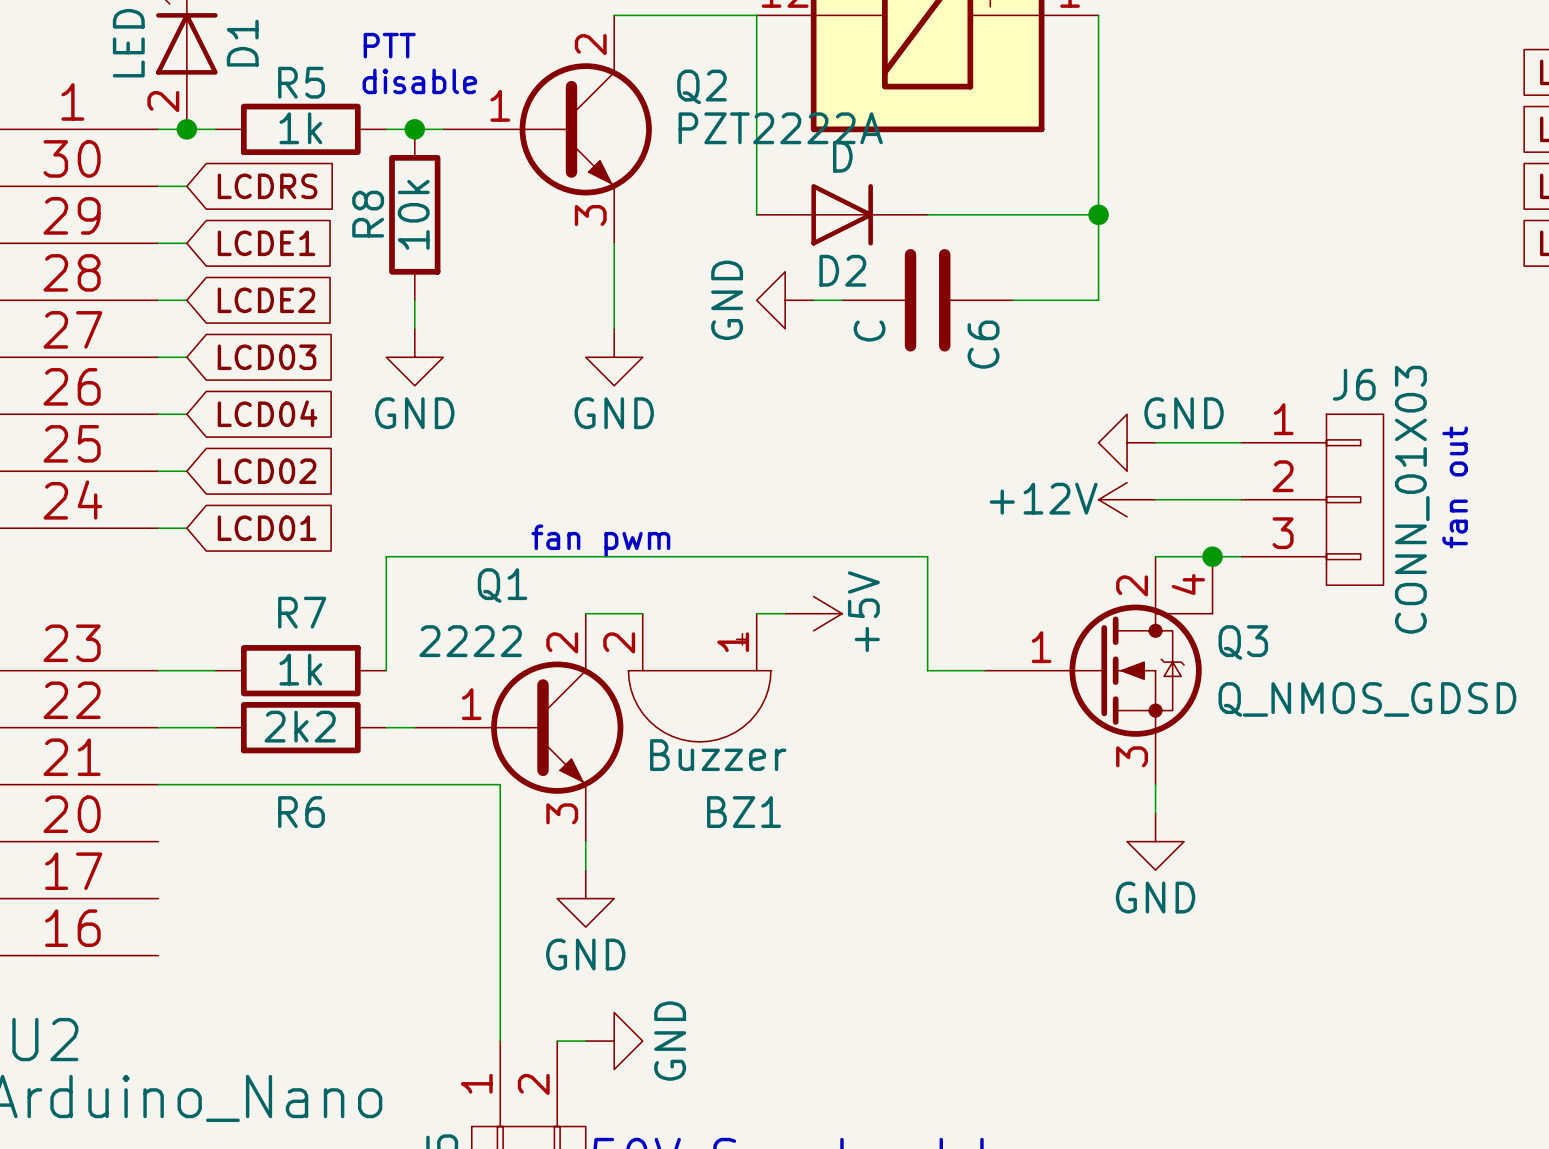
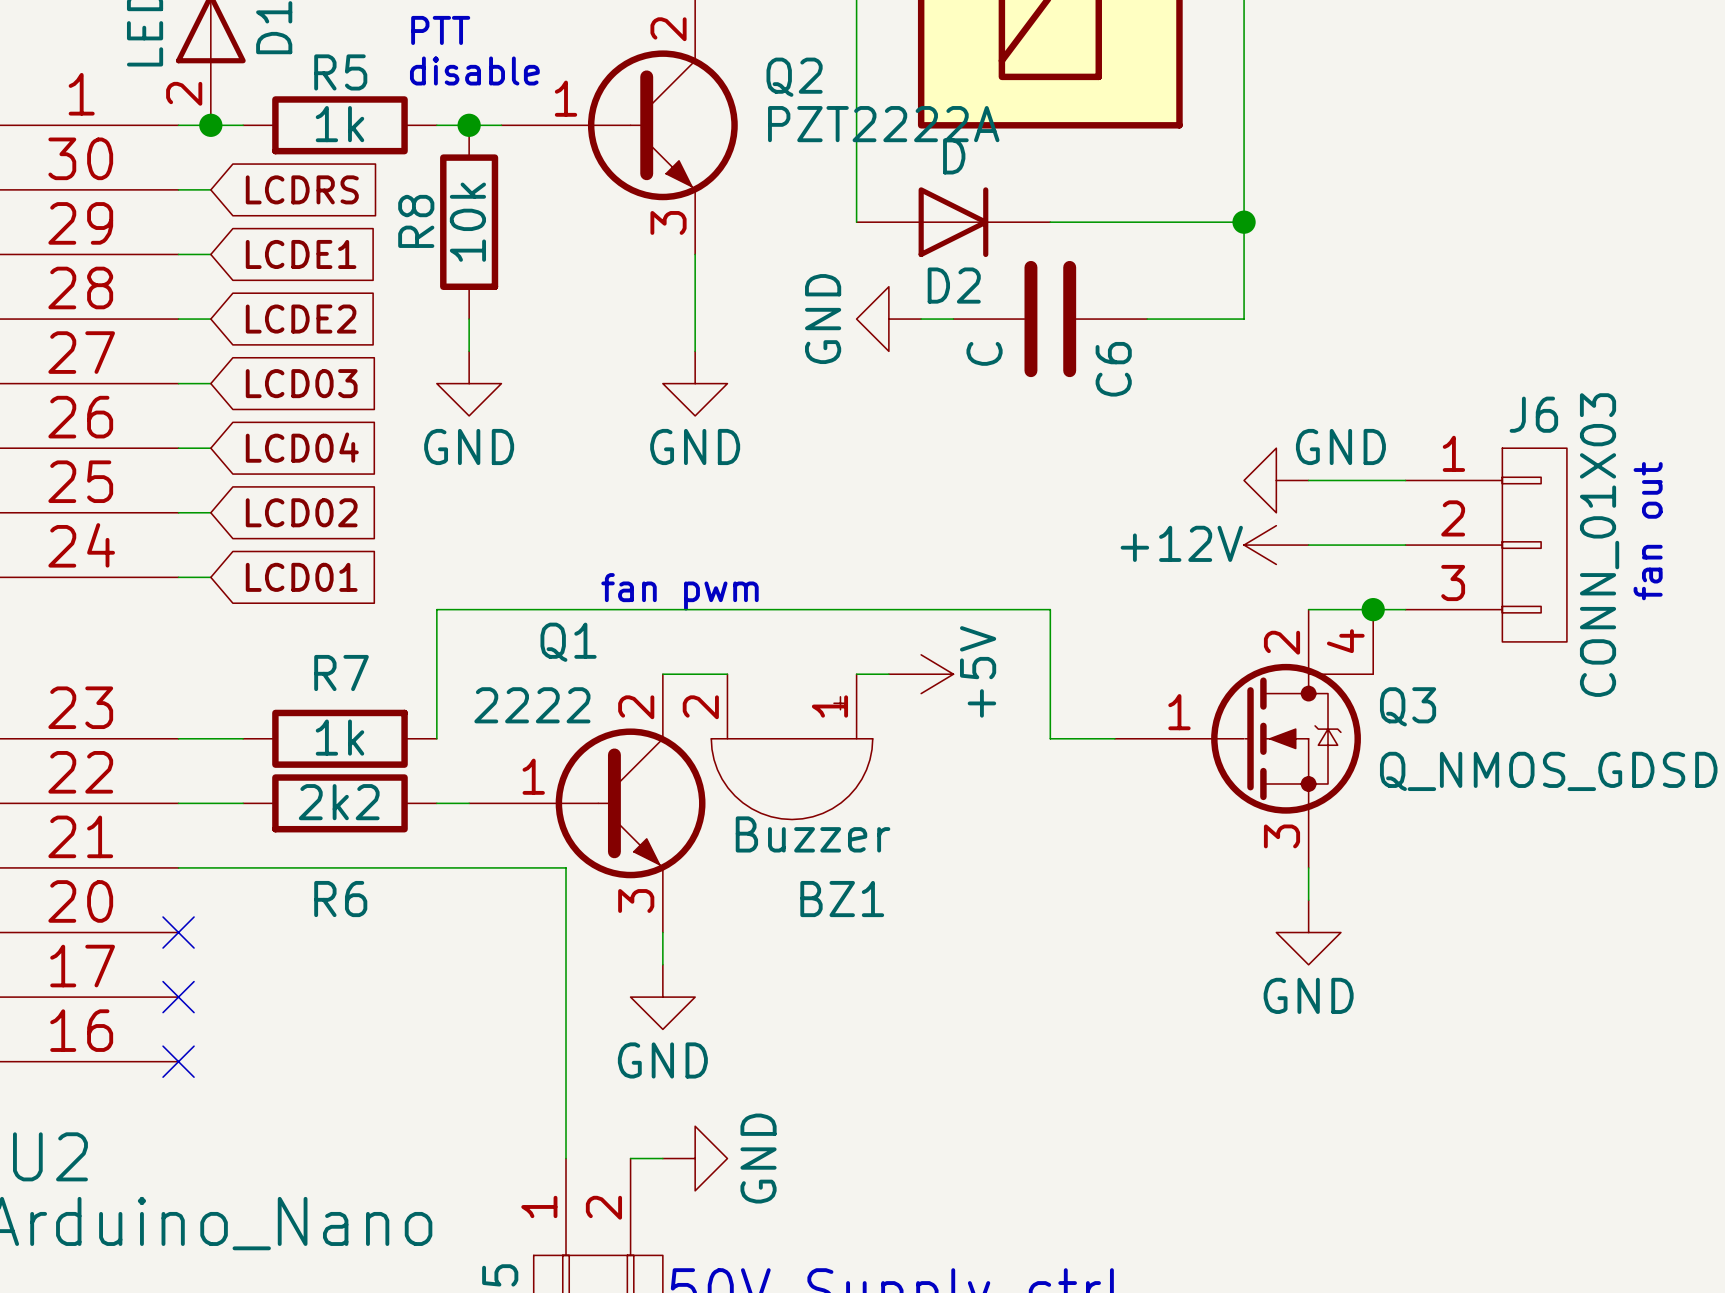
no-connect mark: none -> (178, 932)
no-connect mark: none -> (178, 997)
no-connect mark: none -> (178, 1061)

